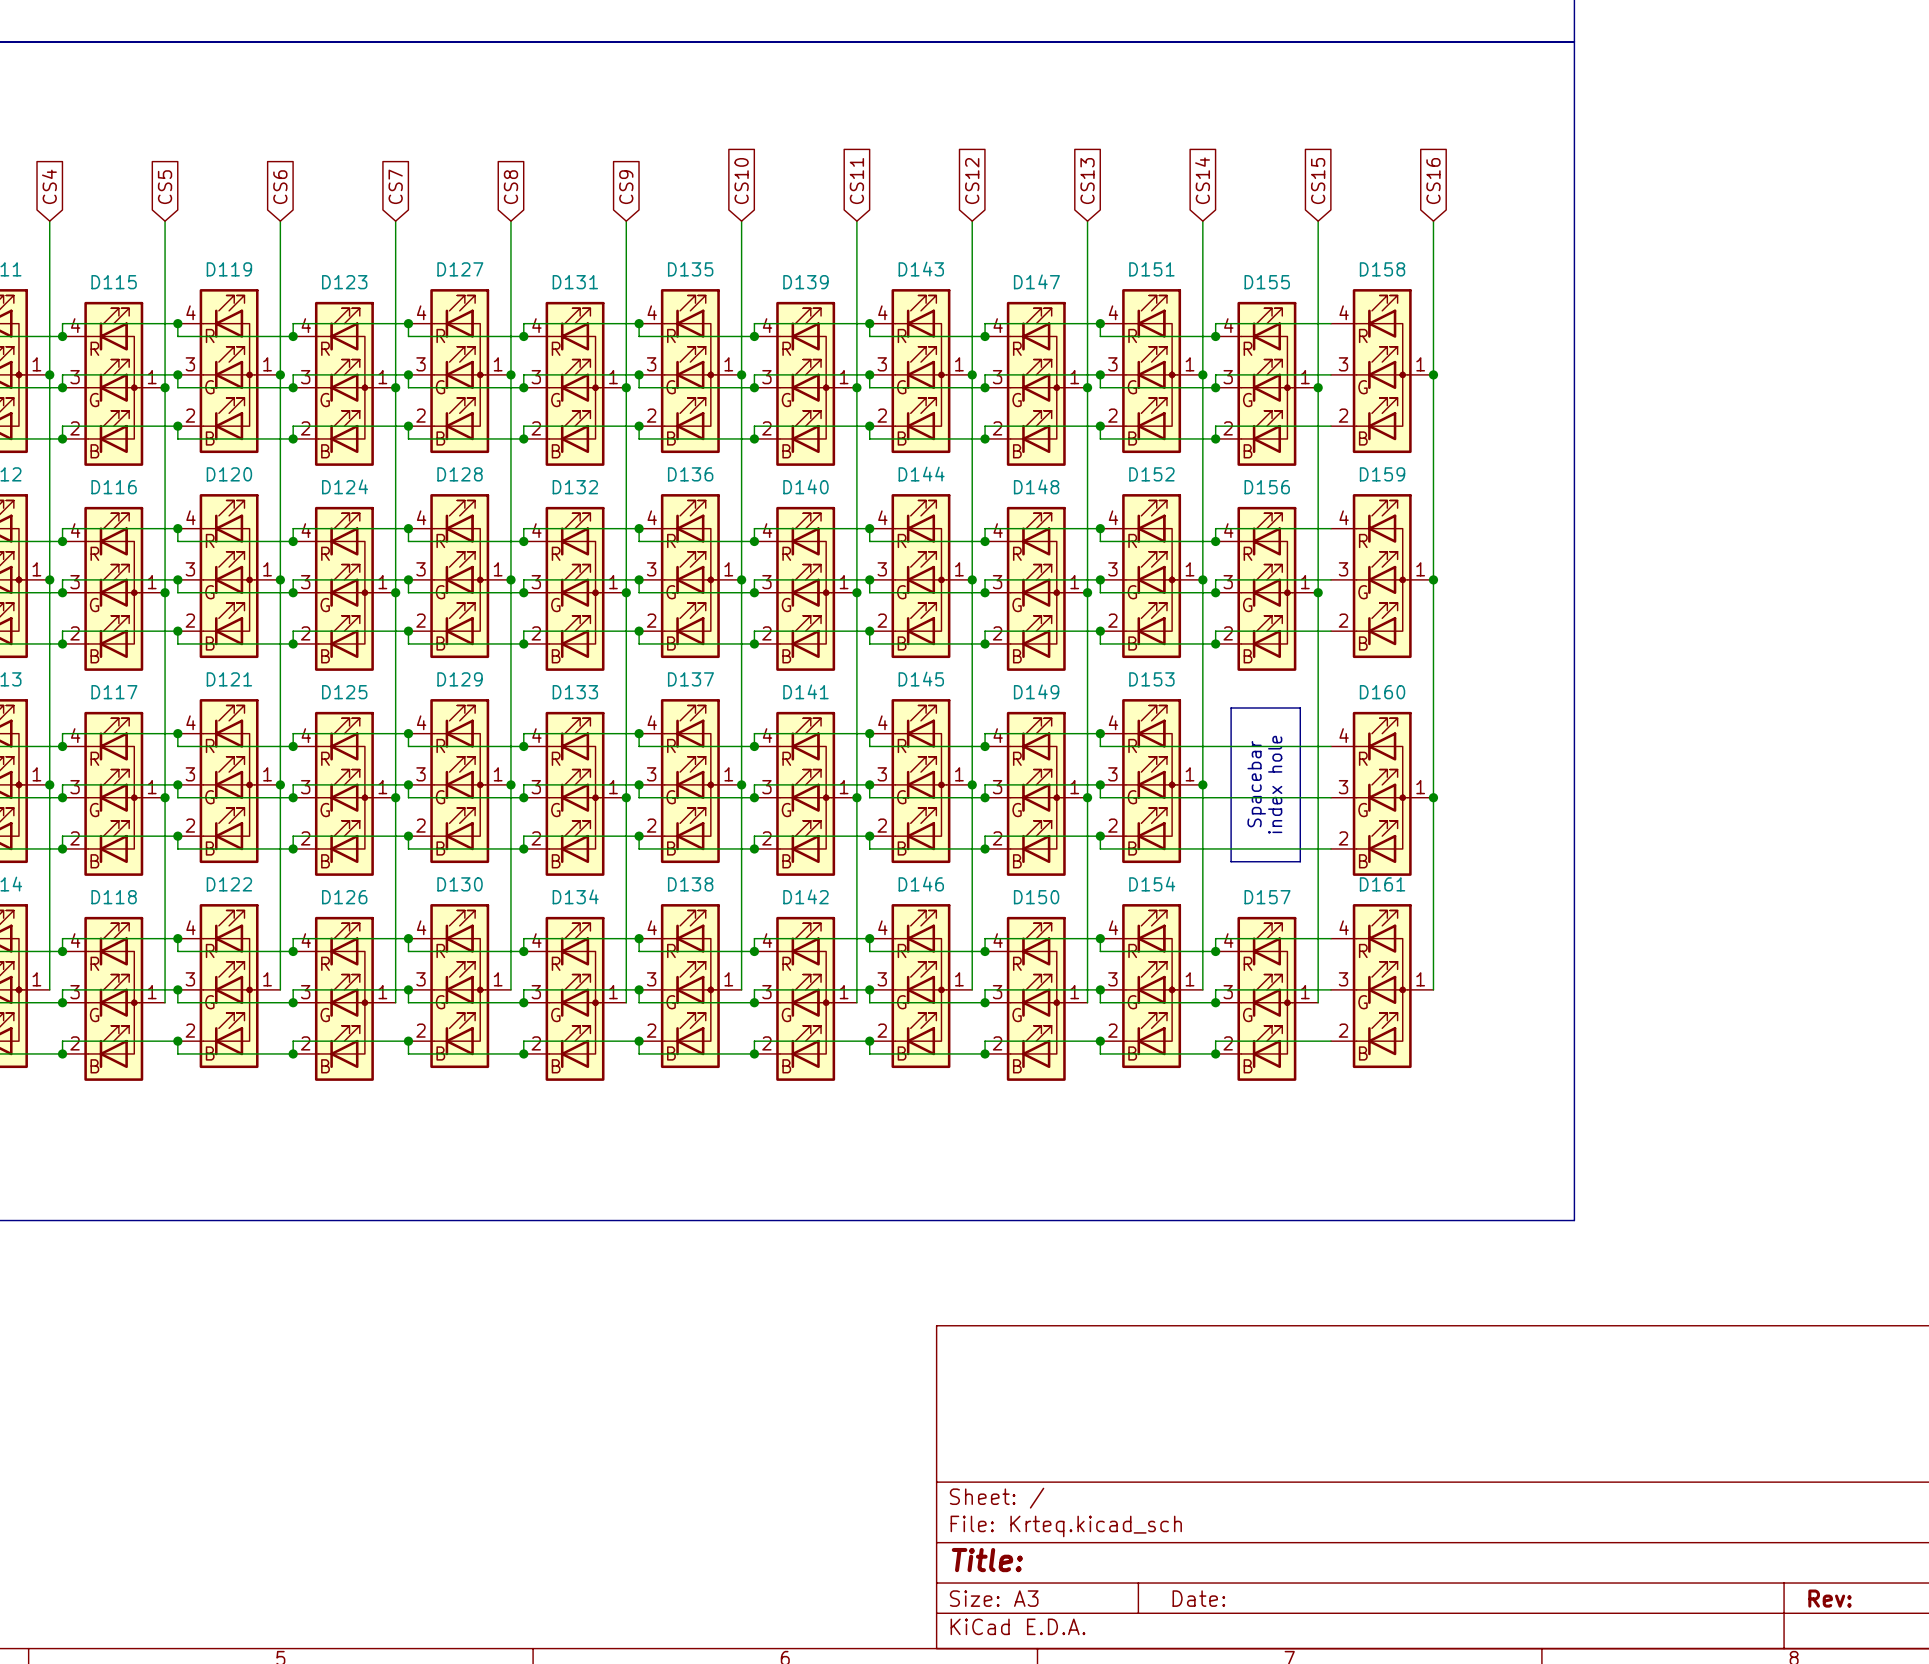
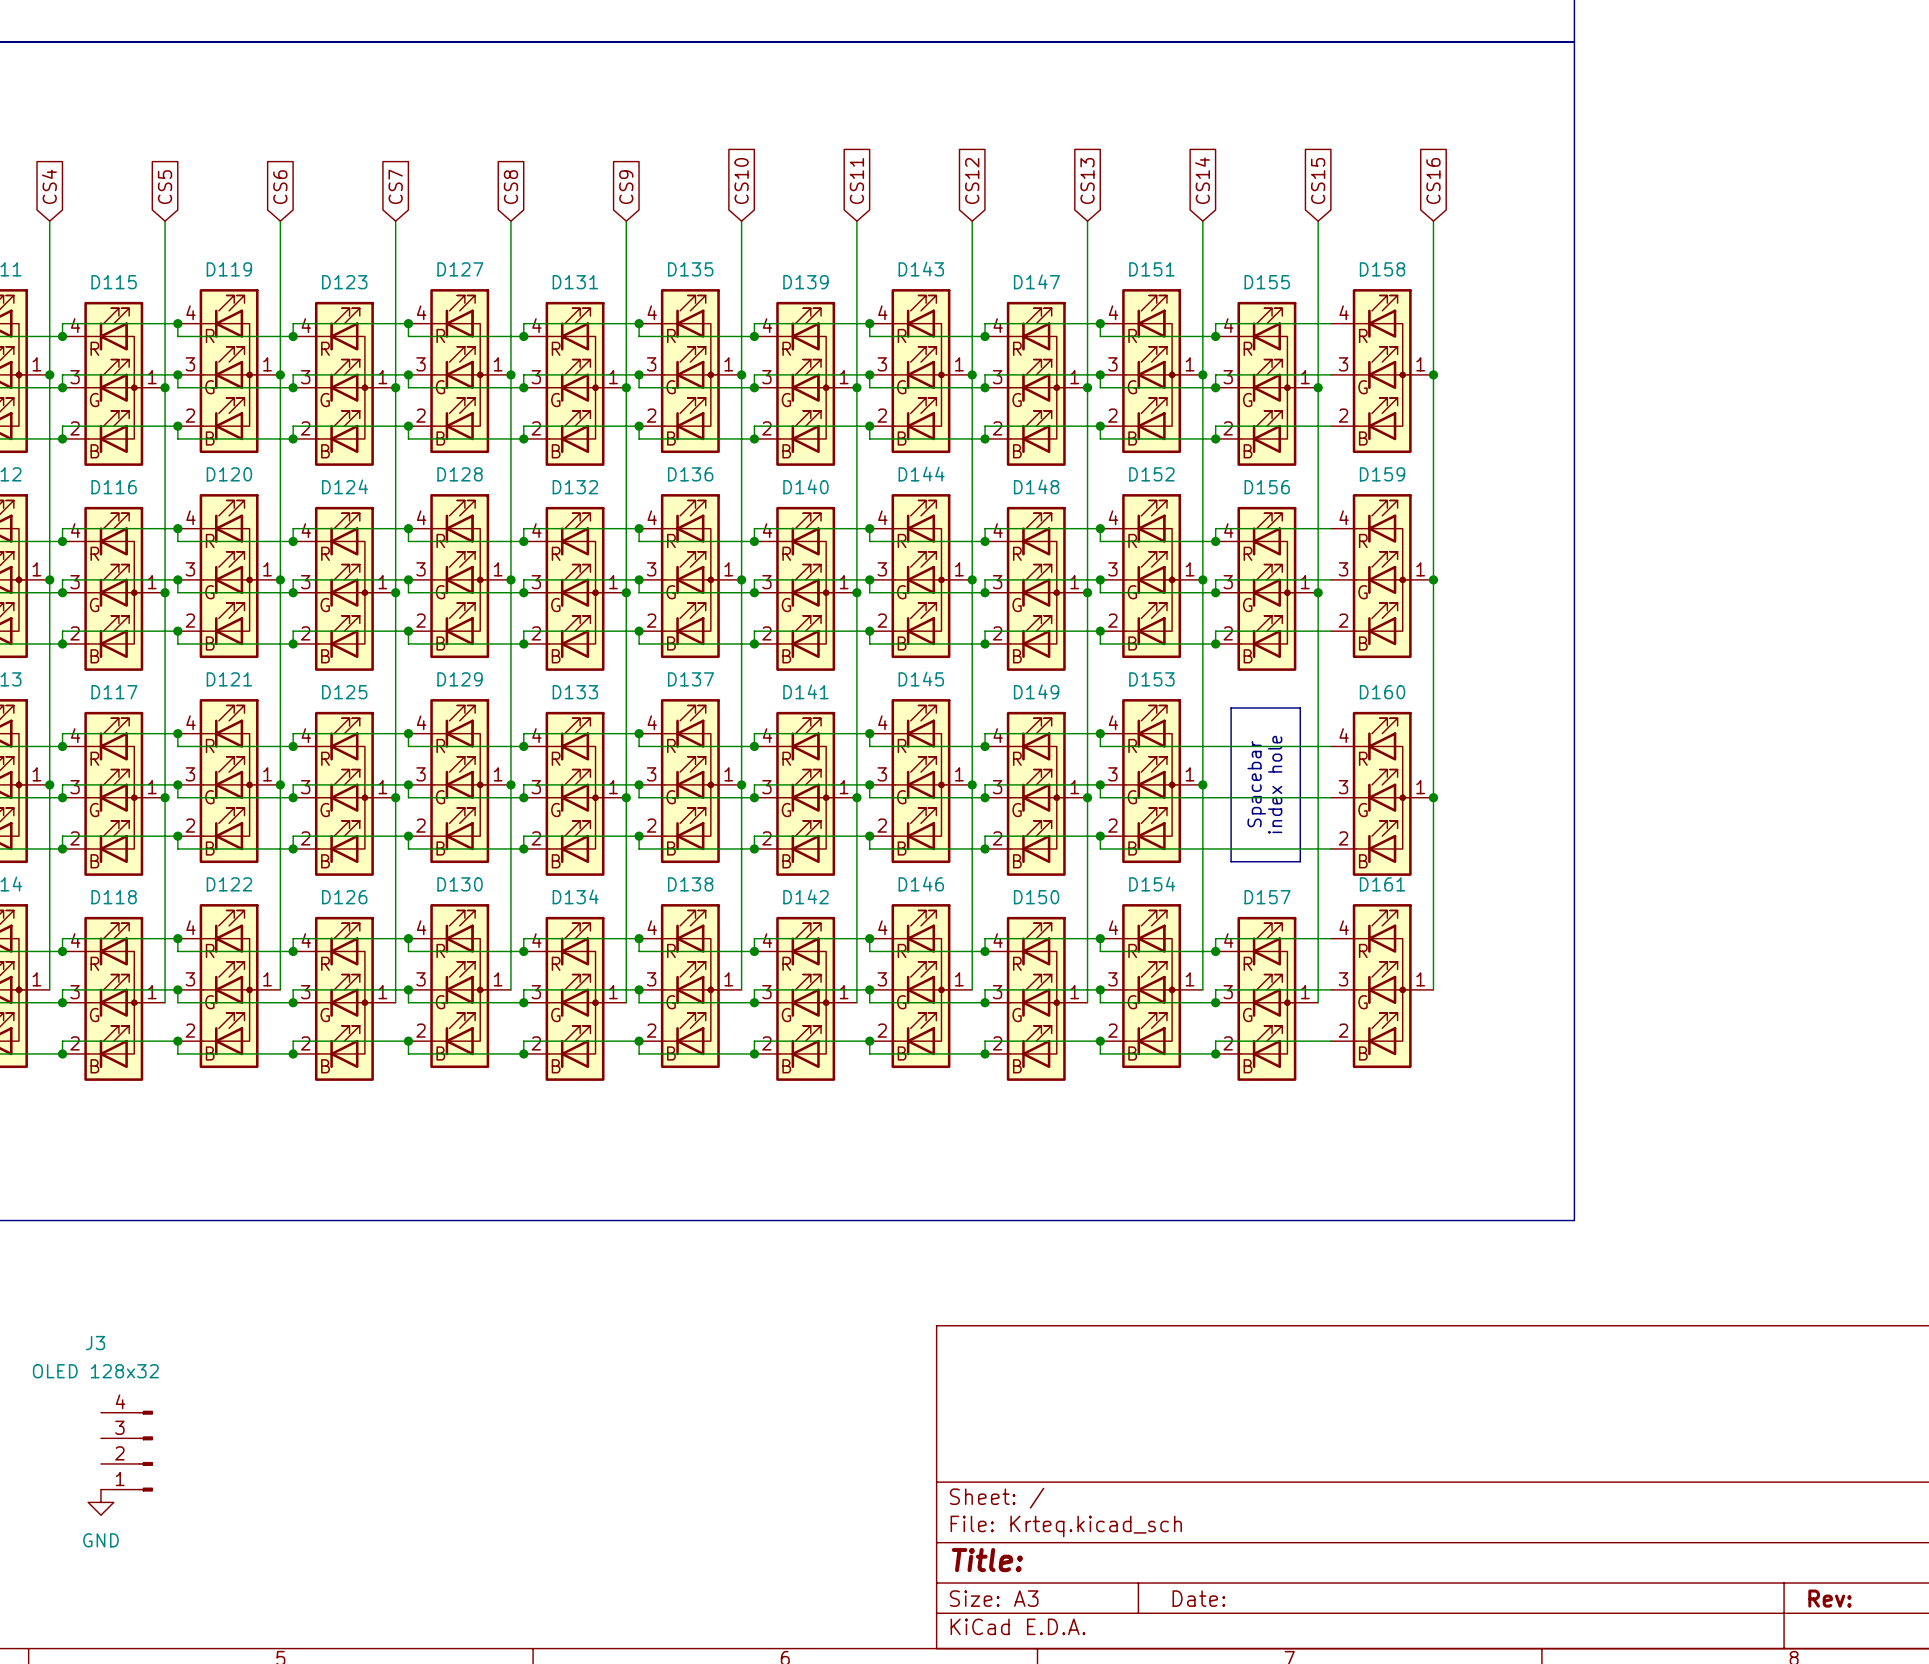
J3: none -> OLED 128x32 (126, 1451)
power symbol: none -> GND (100, 1502)

